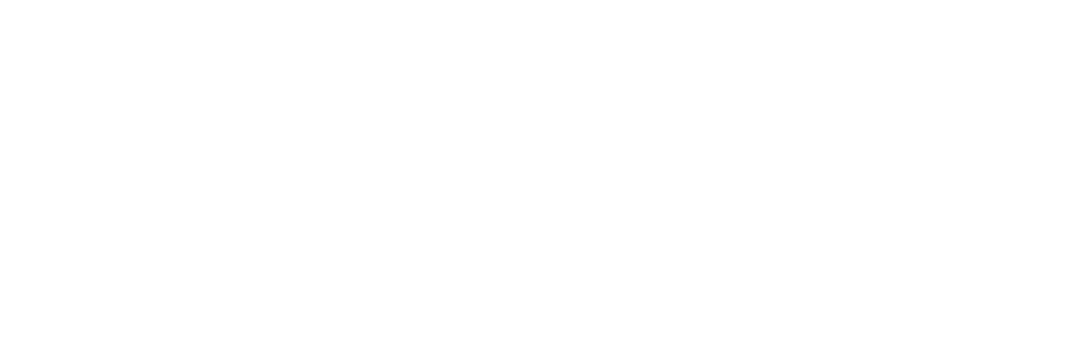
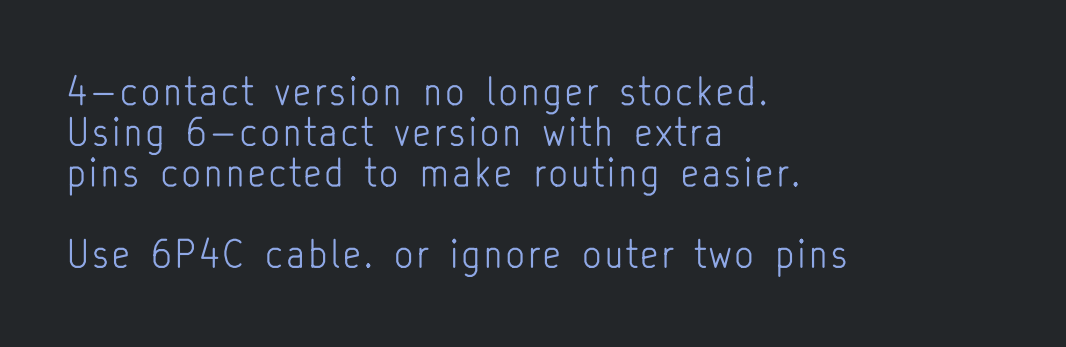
text: none -> 4-contact version no longer stocked. (417, 94)
text: none -> Using 6-contact version with extra (394, 135)
text: none -> pins connected to make routing easier. (433, 176)
text: none -> Use 6P4C cable. or ignore outer two pins (457, 257)

